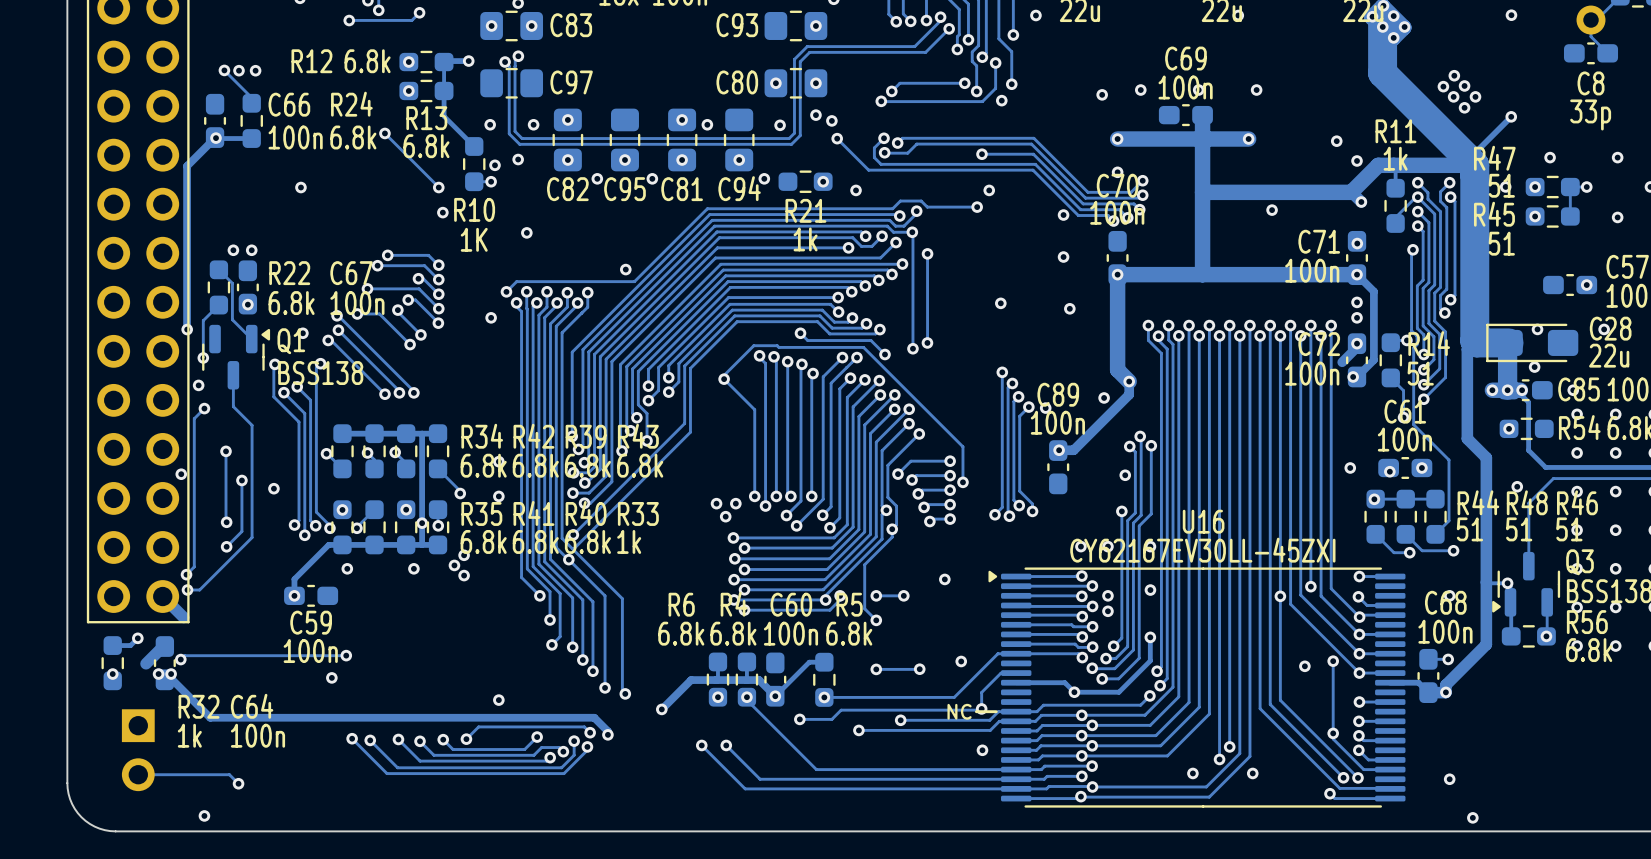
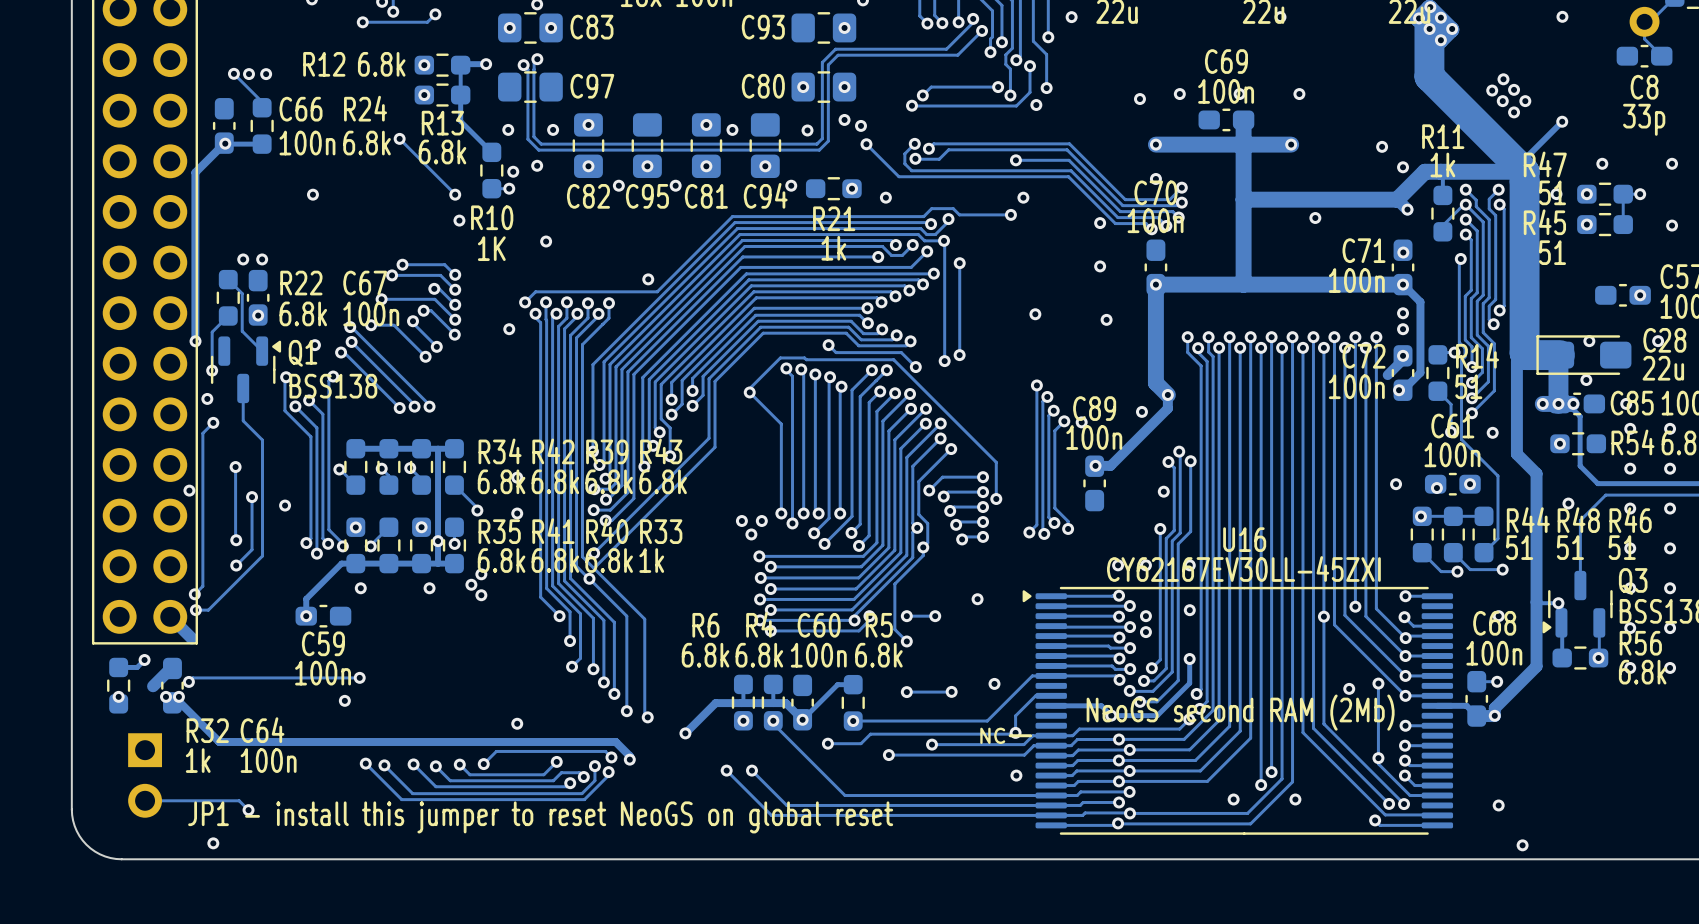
via: none -> (1492, 432)
text: none -> NeoGS second RAM (2Mb) (1240, 712)
text: none -> JP1 - install this jumper to reset NeoGS on global reset (540, 817)

